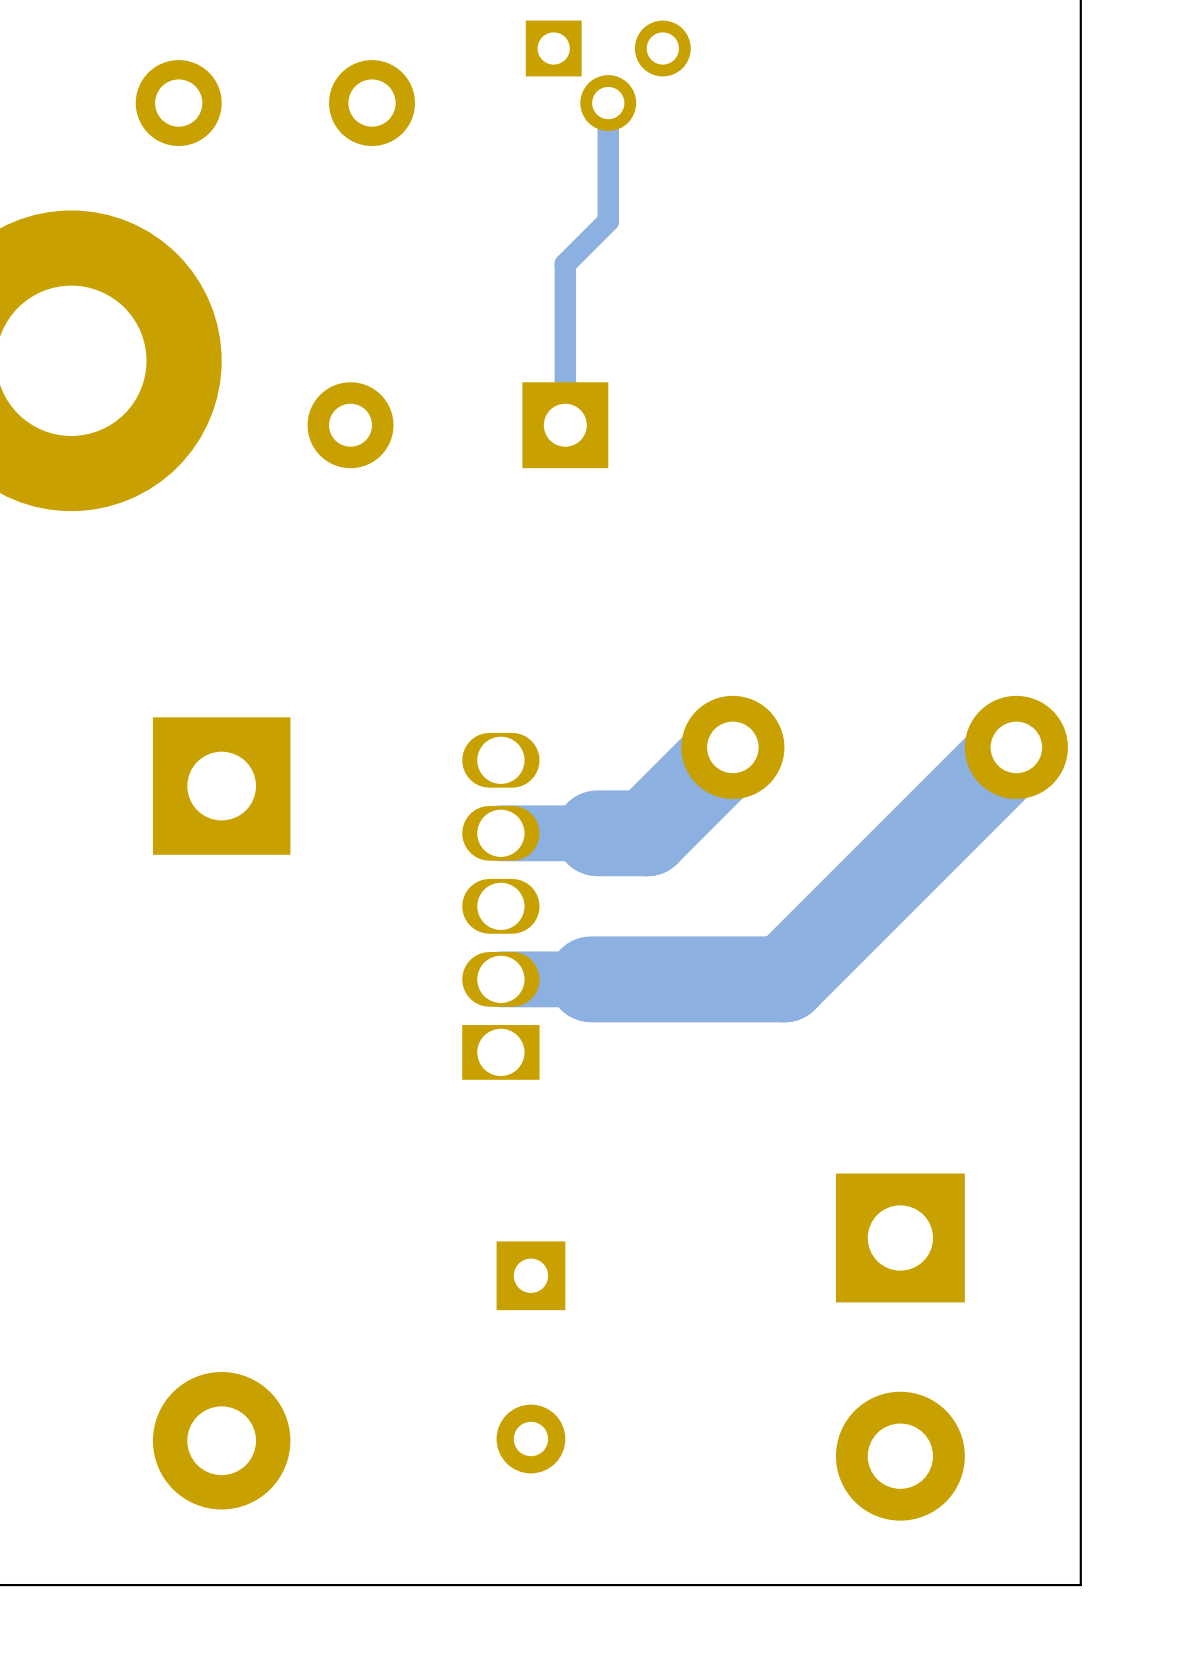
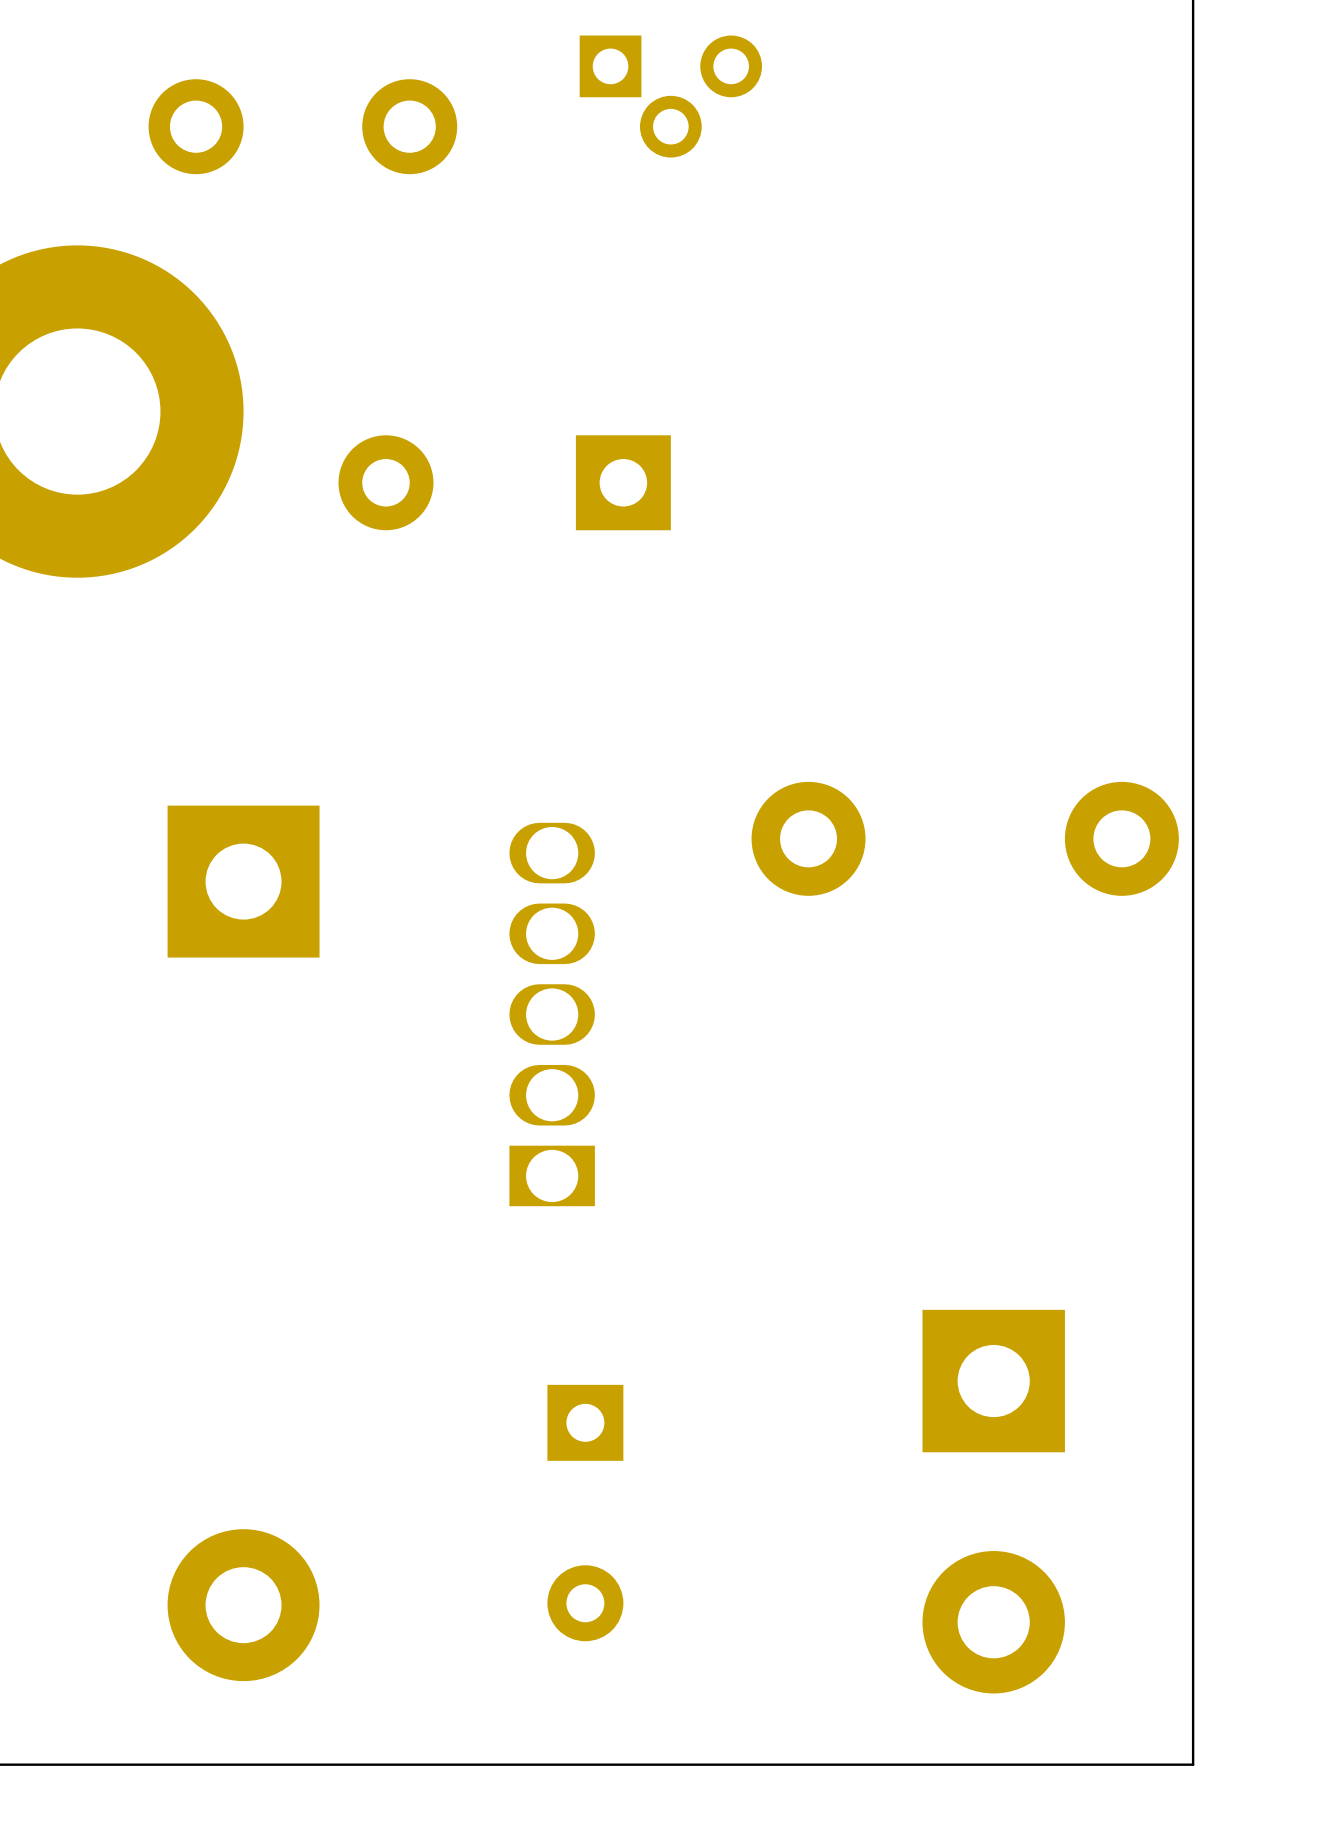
track: (608, 103) (608, 221) (565, 264) (565, 425) -> none
track: (732, 747) (646, 833) (500, 833) -> none
track: (1016, 747) (784, 979) (500, 979) -> none

